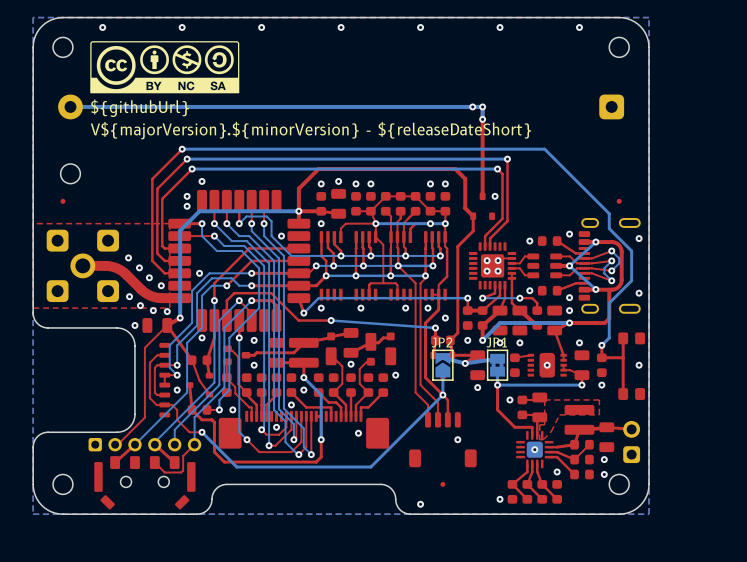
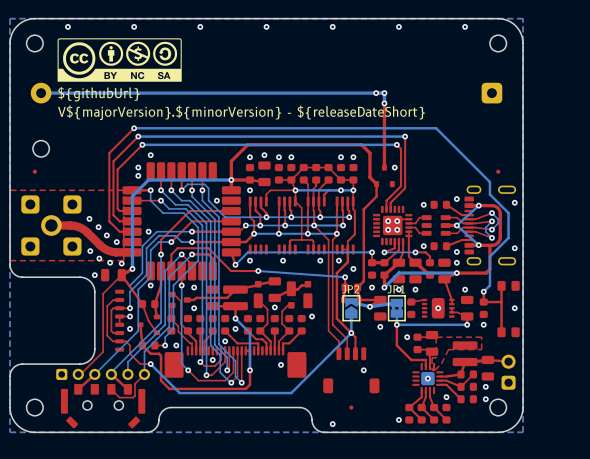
bottom track: (177, 337) (169, 345) (169, 367) (177, 375) -> none

